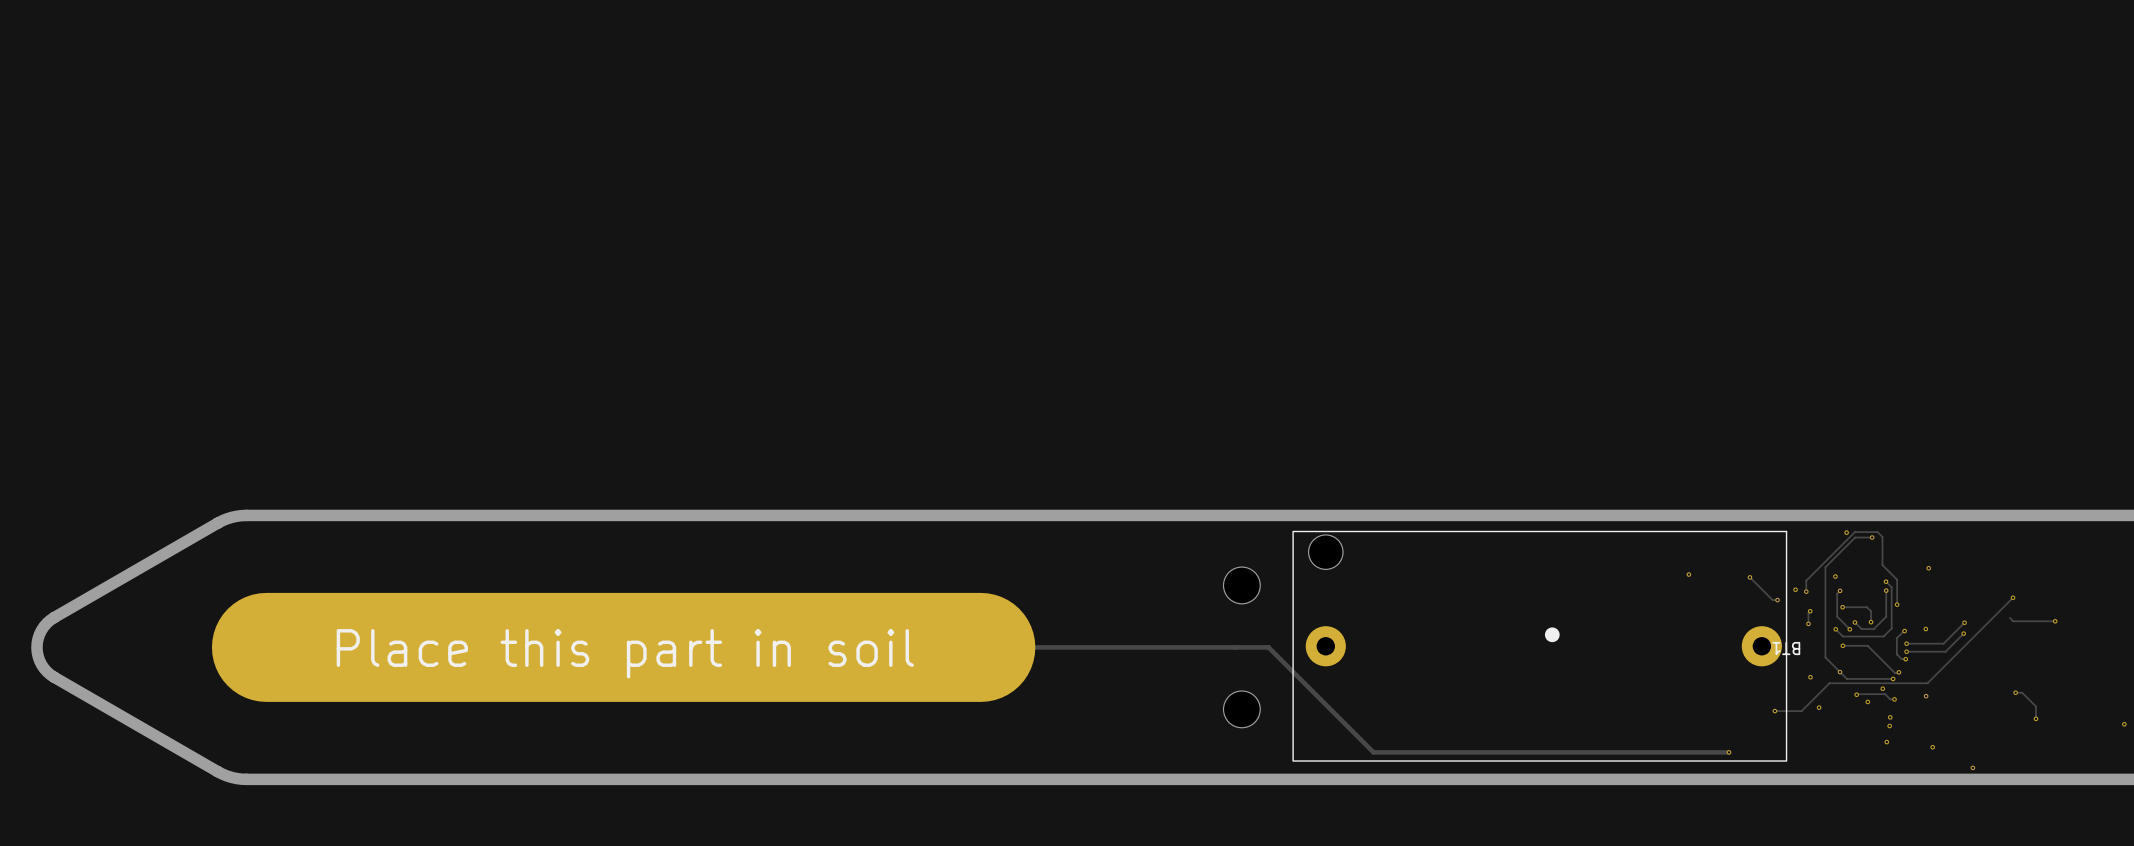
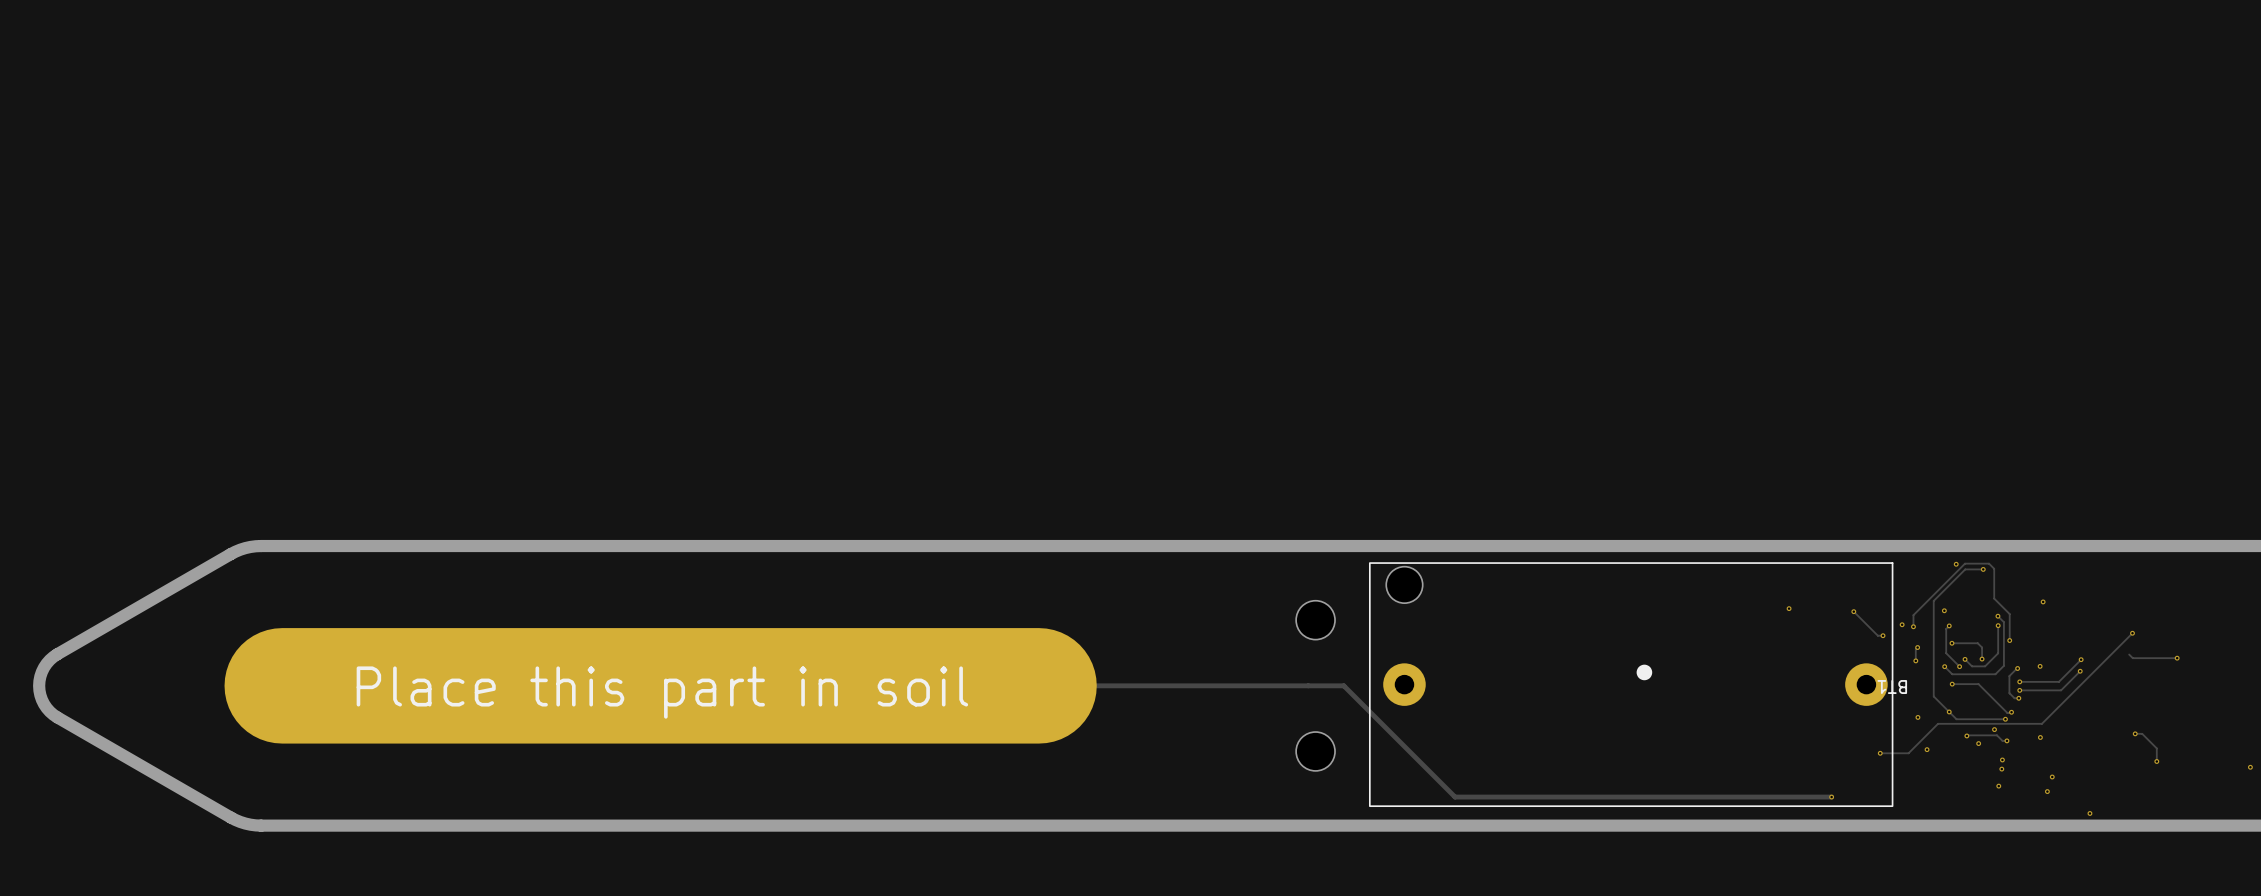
via: none -> (2052, 777)

